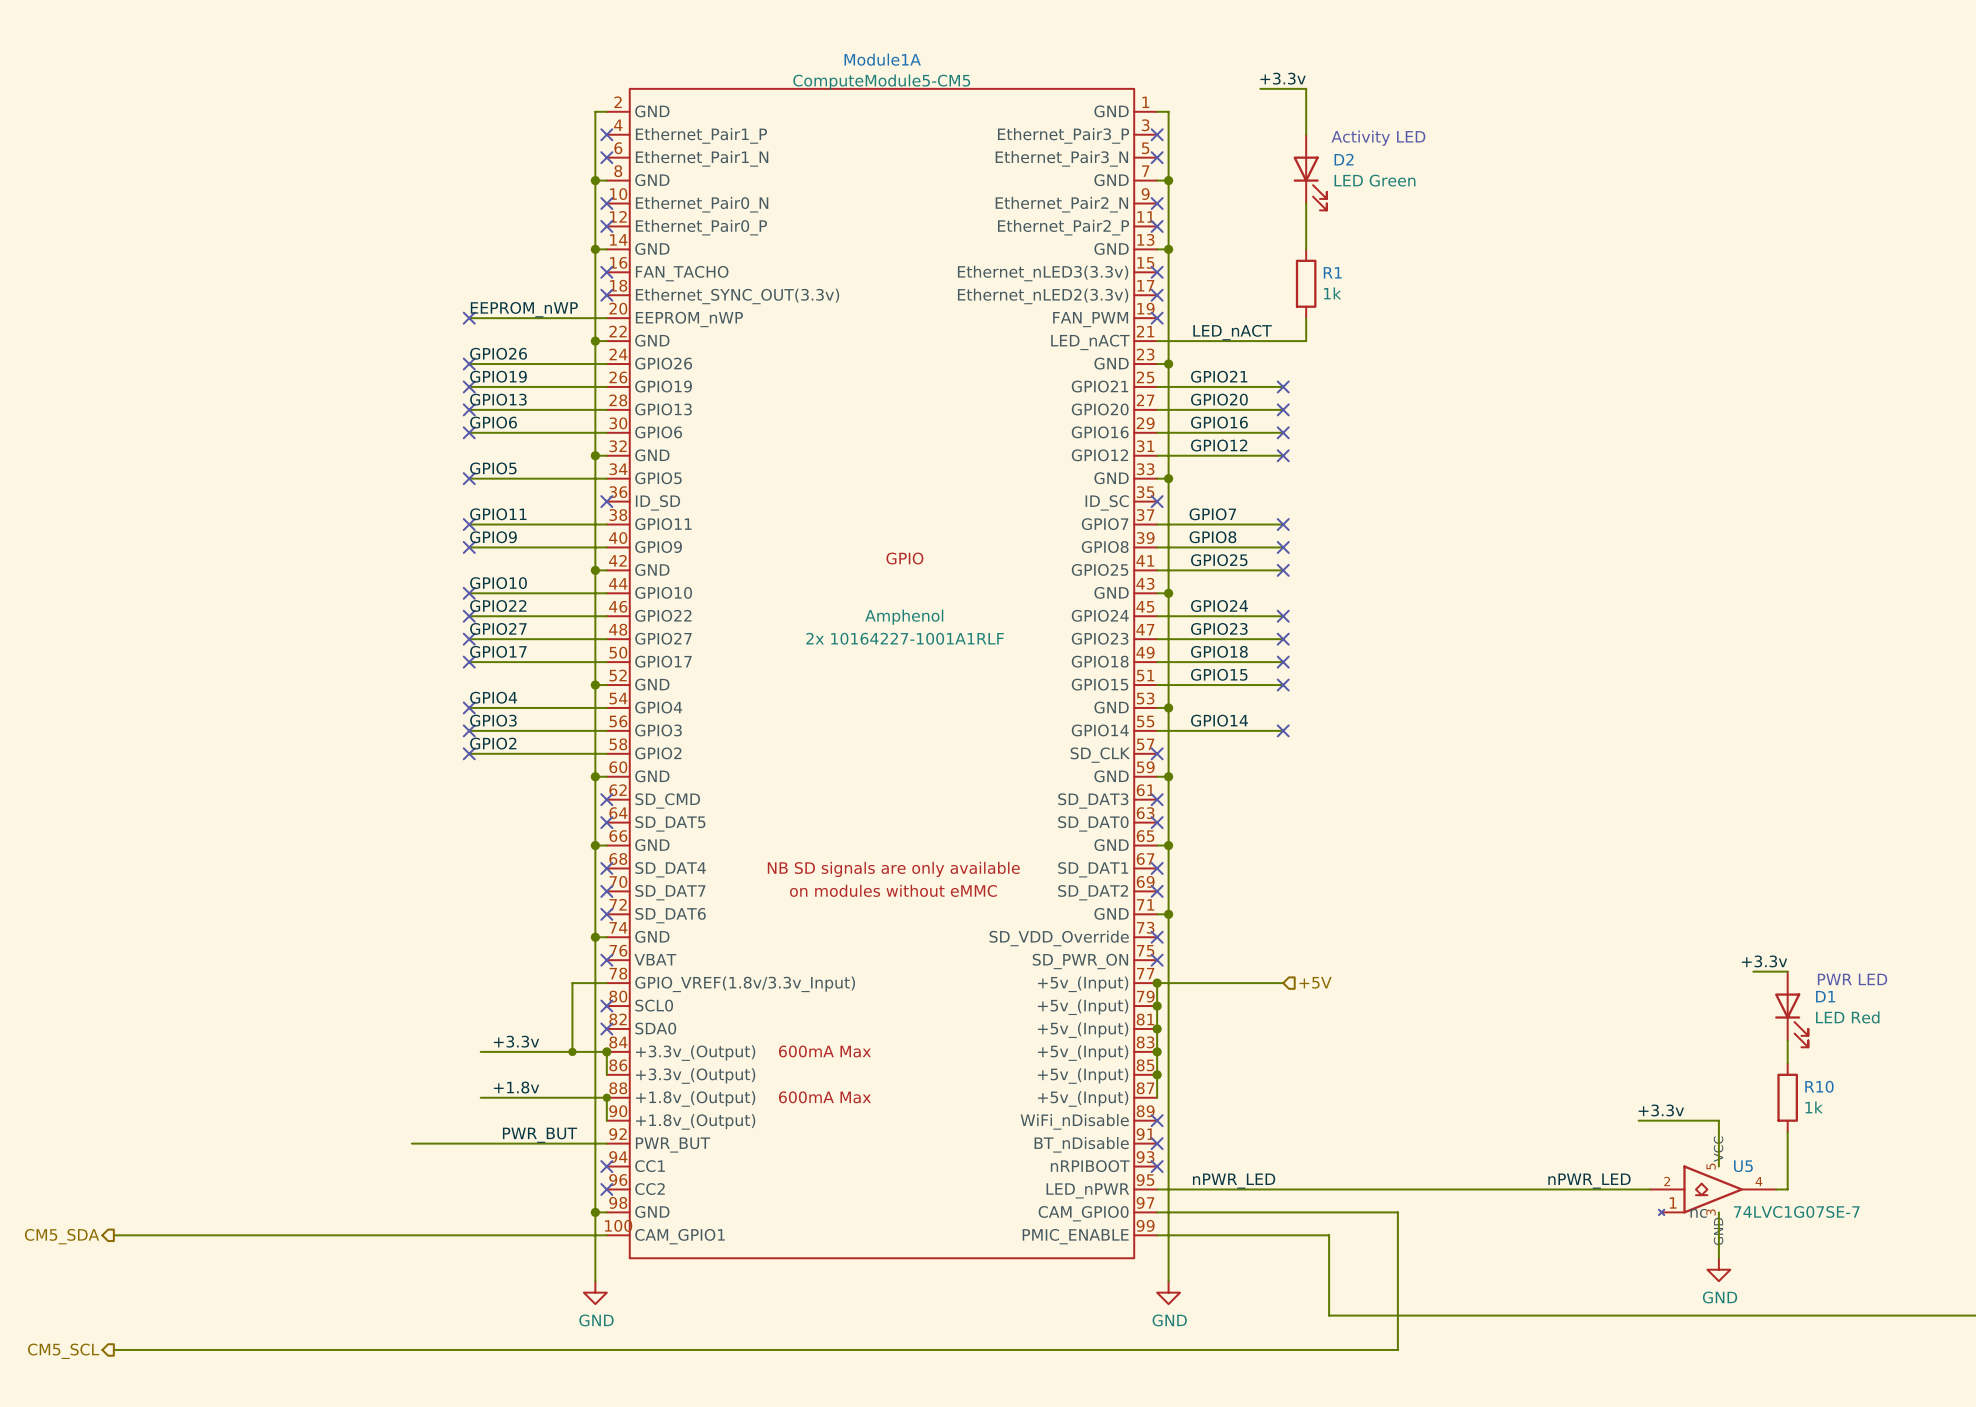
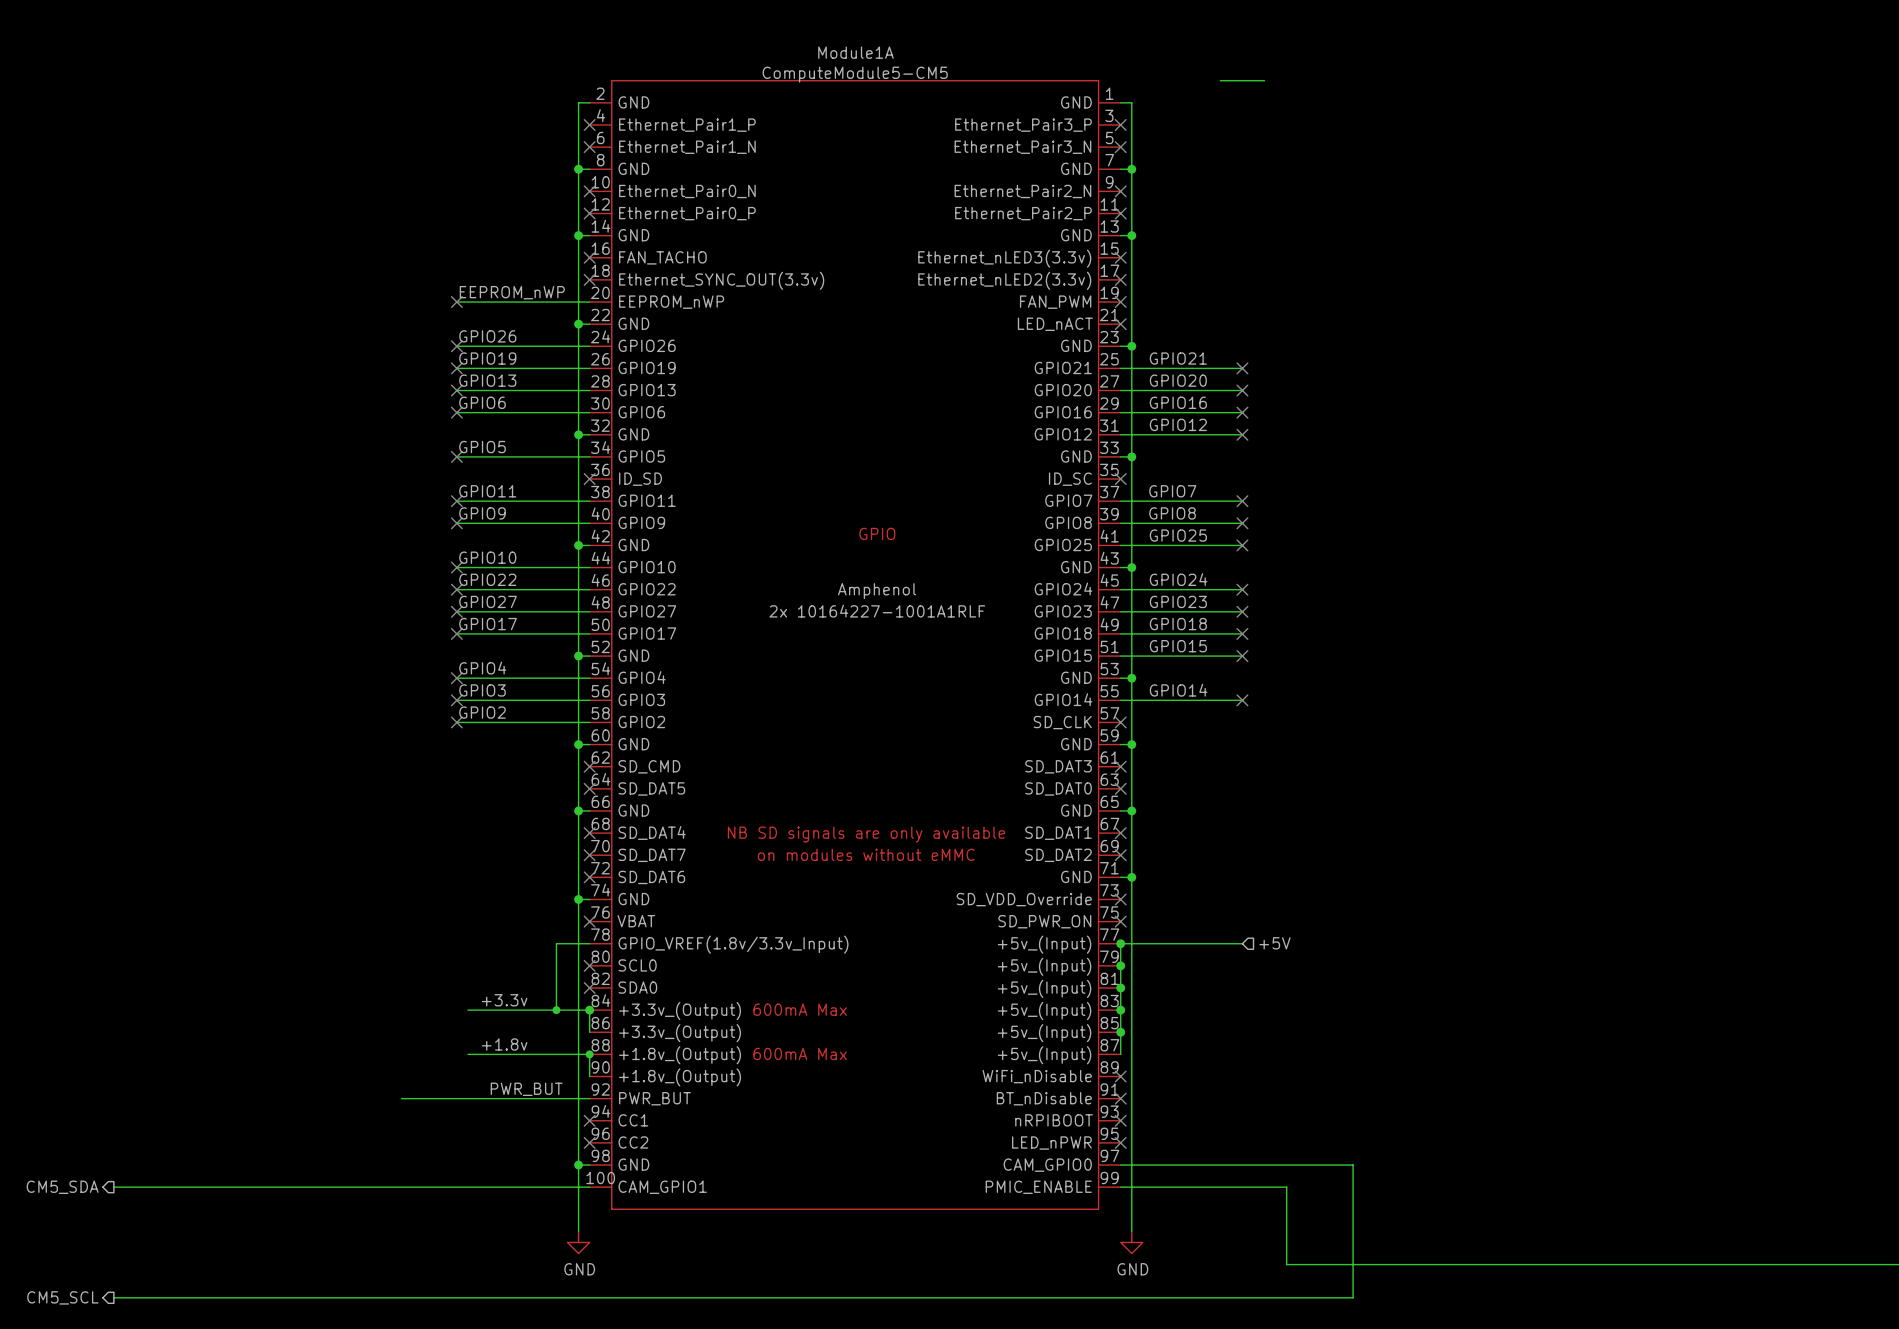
label: +3.3v (1283, 78) -> none
wire: (1306, 88) (1306, 134) -> none
text: Activity LED (1378, 138) -> none
D2: LED Green (1310, 172) -> none
wire: (1306, 203) (1306, 249) -> none
R1: 1k (1306, 283) -> none
wire: (1306, 318) (1306, 341) (1157, 341) -> none
label: LED_nACT (1232, 332) -> none
no-connect mark: none -> (1120, 324)
label: +3.3v (1764, 961) -> none
wire: (1753, 971) (1787, 971) -> none
text: PWR LED (1852, 979) -> none
D1: LED Red (1791, 1009) -> none
wire: (1787, 1040) (1787, 1063) -> none
R10: 1k (1787, 1097) -> none
label: +3.3v (1661, 1110) -> none
wire: (1638, 1120) (1718, 1120) (1718, 1166) -> none
wire: (1787, 1132) (1787, 1189) (1776, 1189) -> none
label: nPWR_LED (1234, 1181) -> none
label: nPWR_LED (1589, 1181) -> none
wire: (1157, 1189) (1650, 1189) -> none
no-connect mark: none -> (1120, 1142)
U5: 74LVC1G07SE-7 (1713, 1190) -> none
wire: (1718, 1212) (1718, 1258) -> none
power symbol: GND (1718, 1269) -> none

